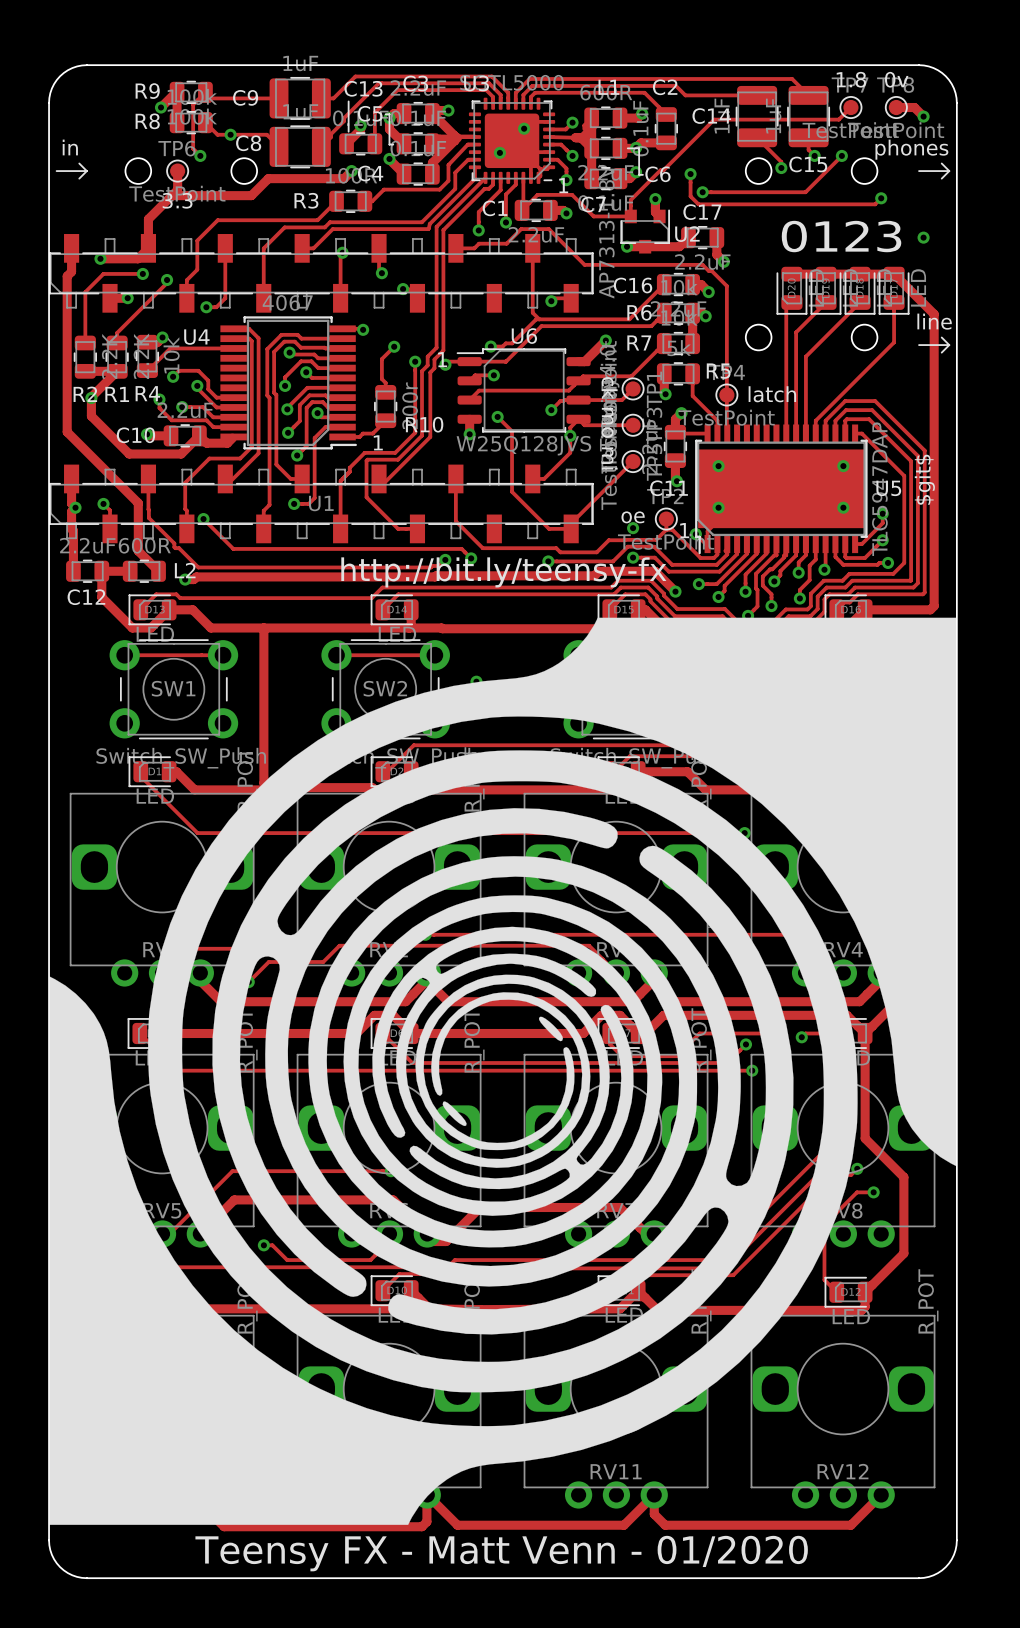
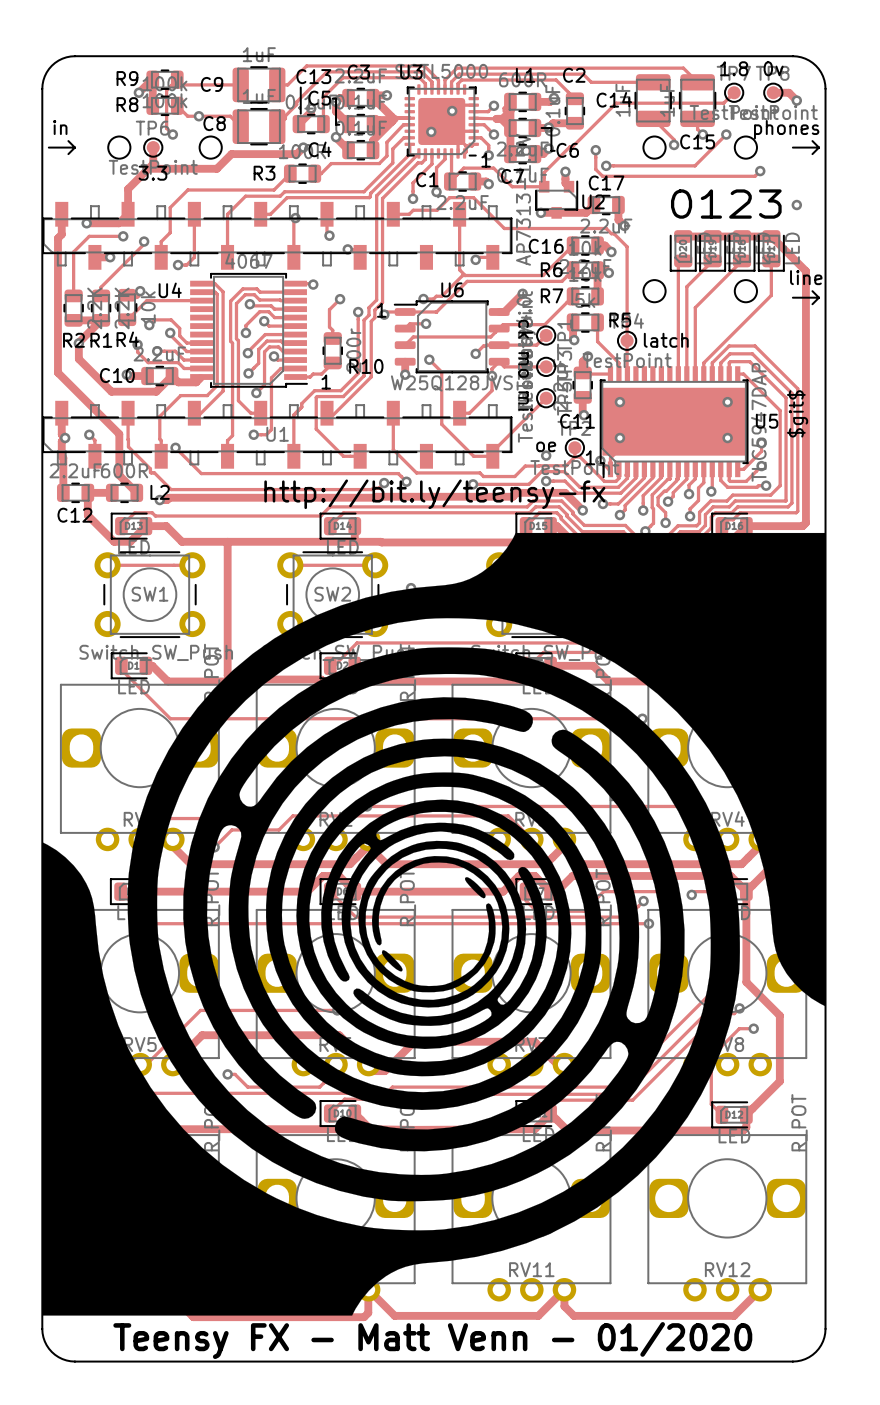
RV12 footprint: [750, 1314, 936, 1509] -> [647, 1134, 807, 1302]

